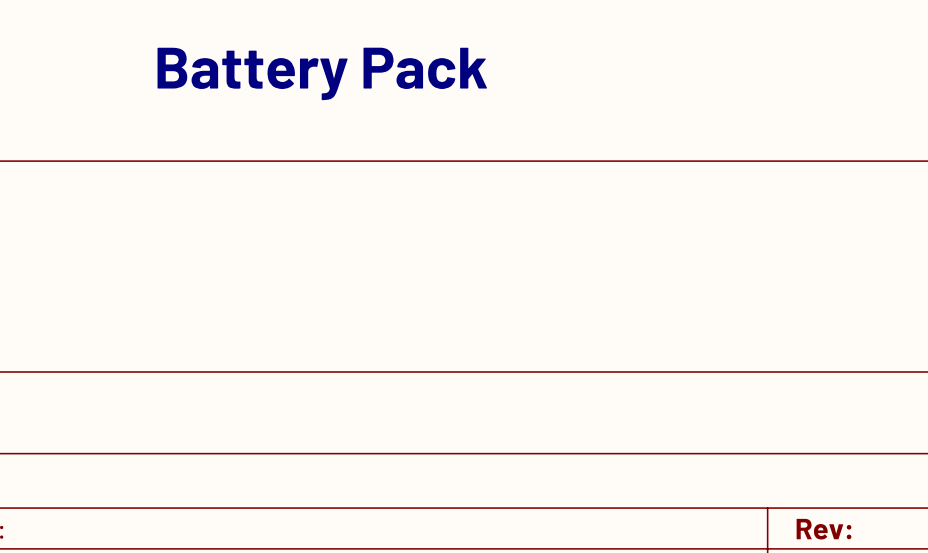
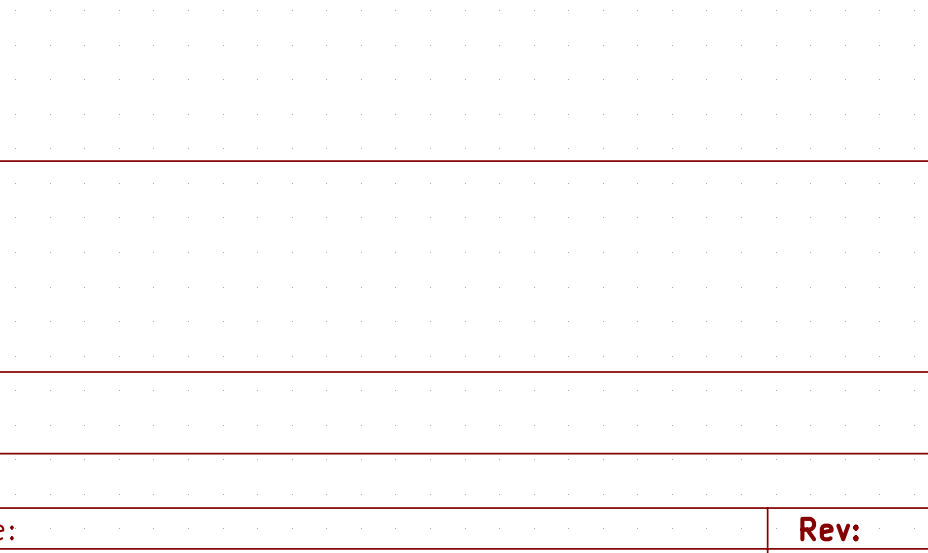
text: Battery Pack (322, 73) -> none

